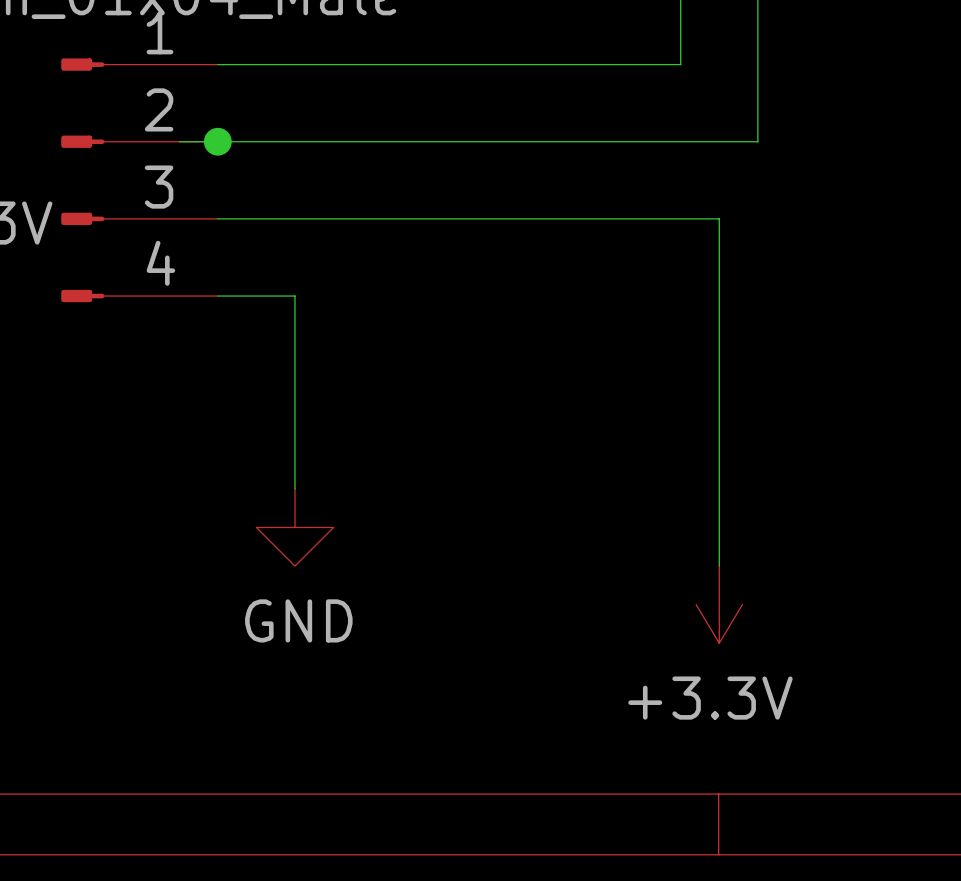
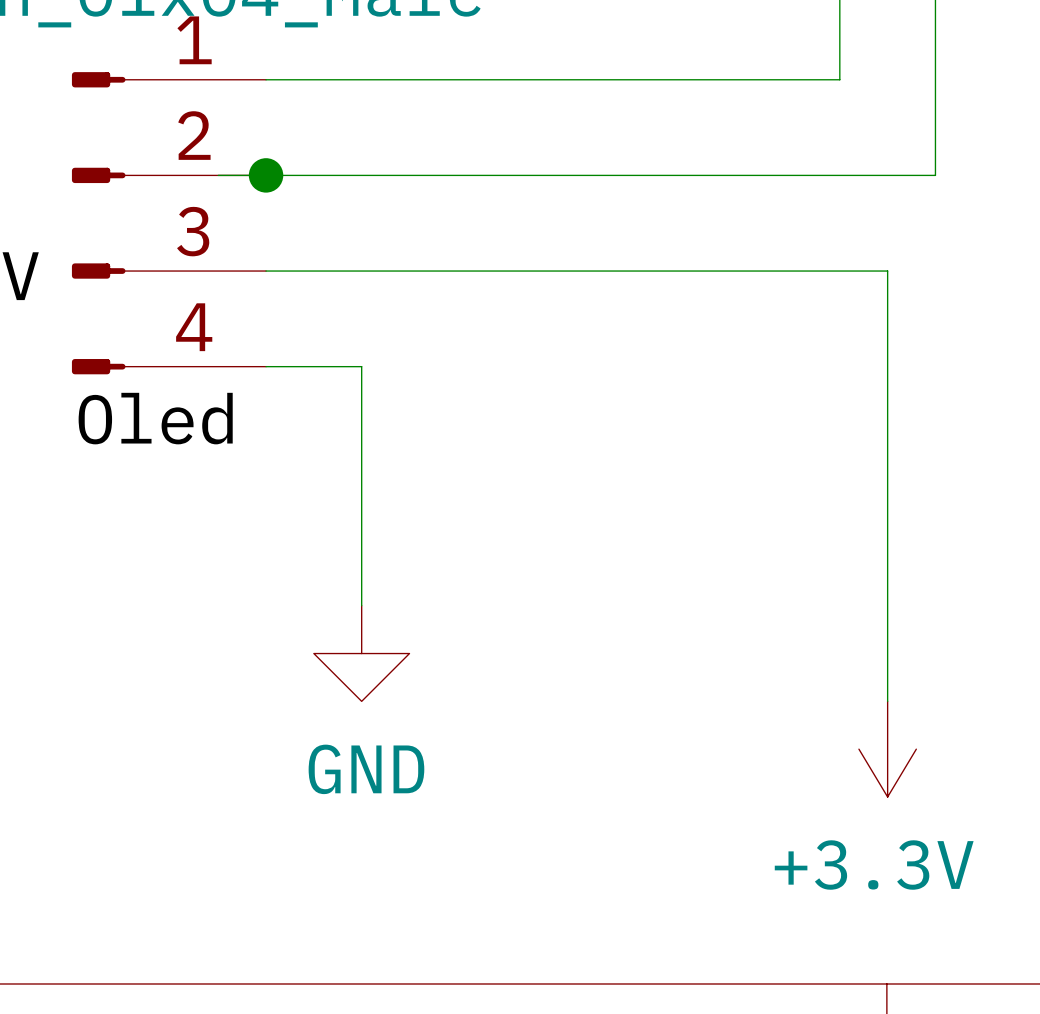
label: none -> Oled (155, 418)

